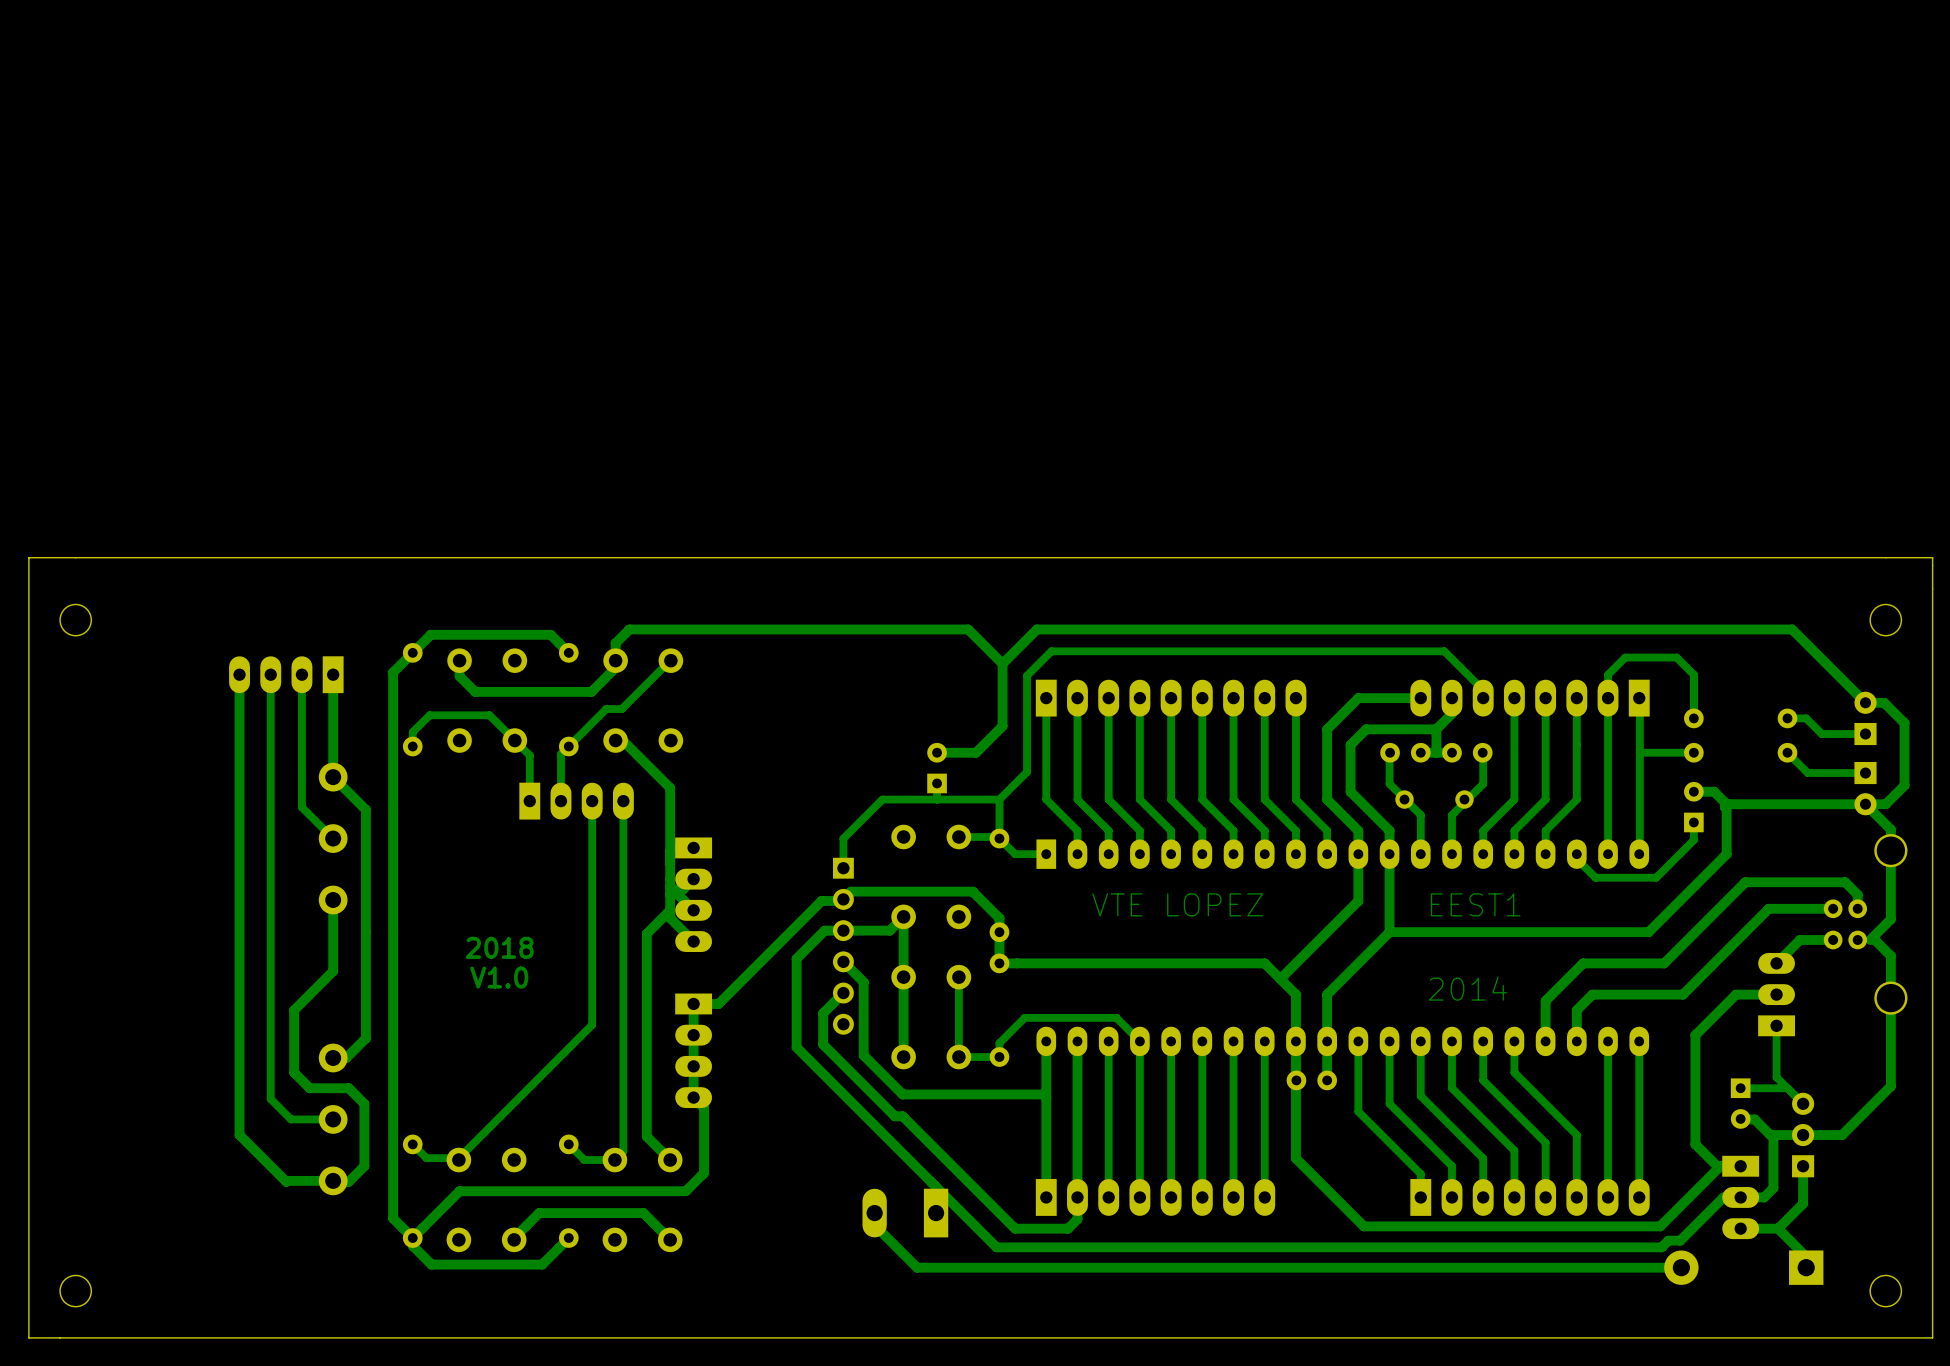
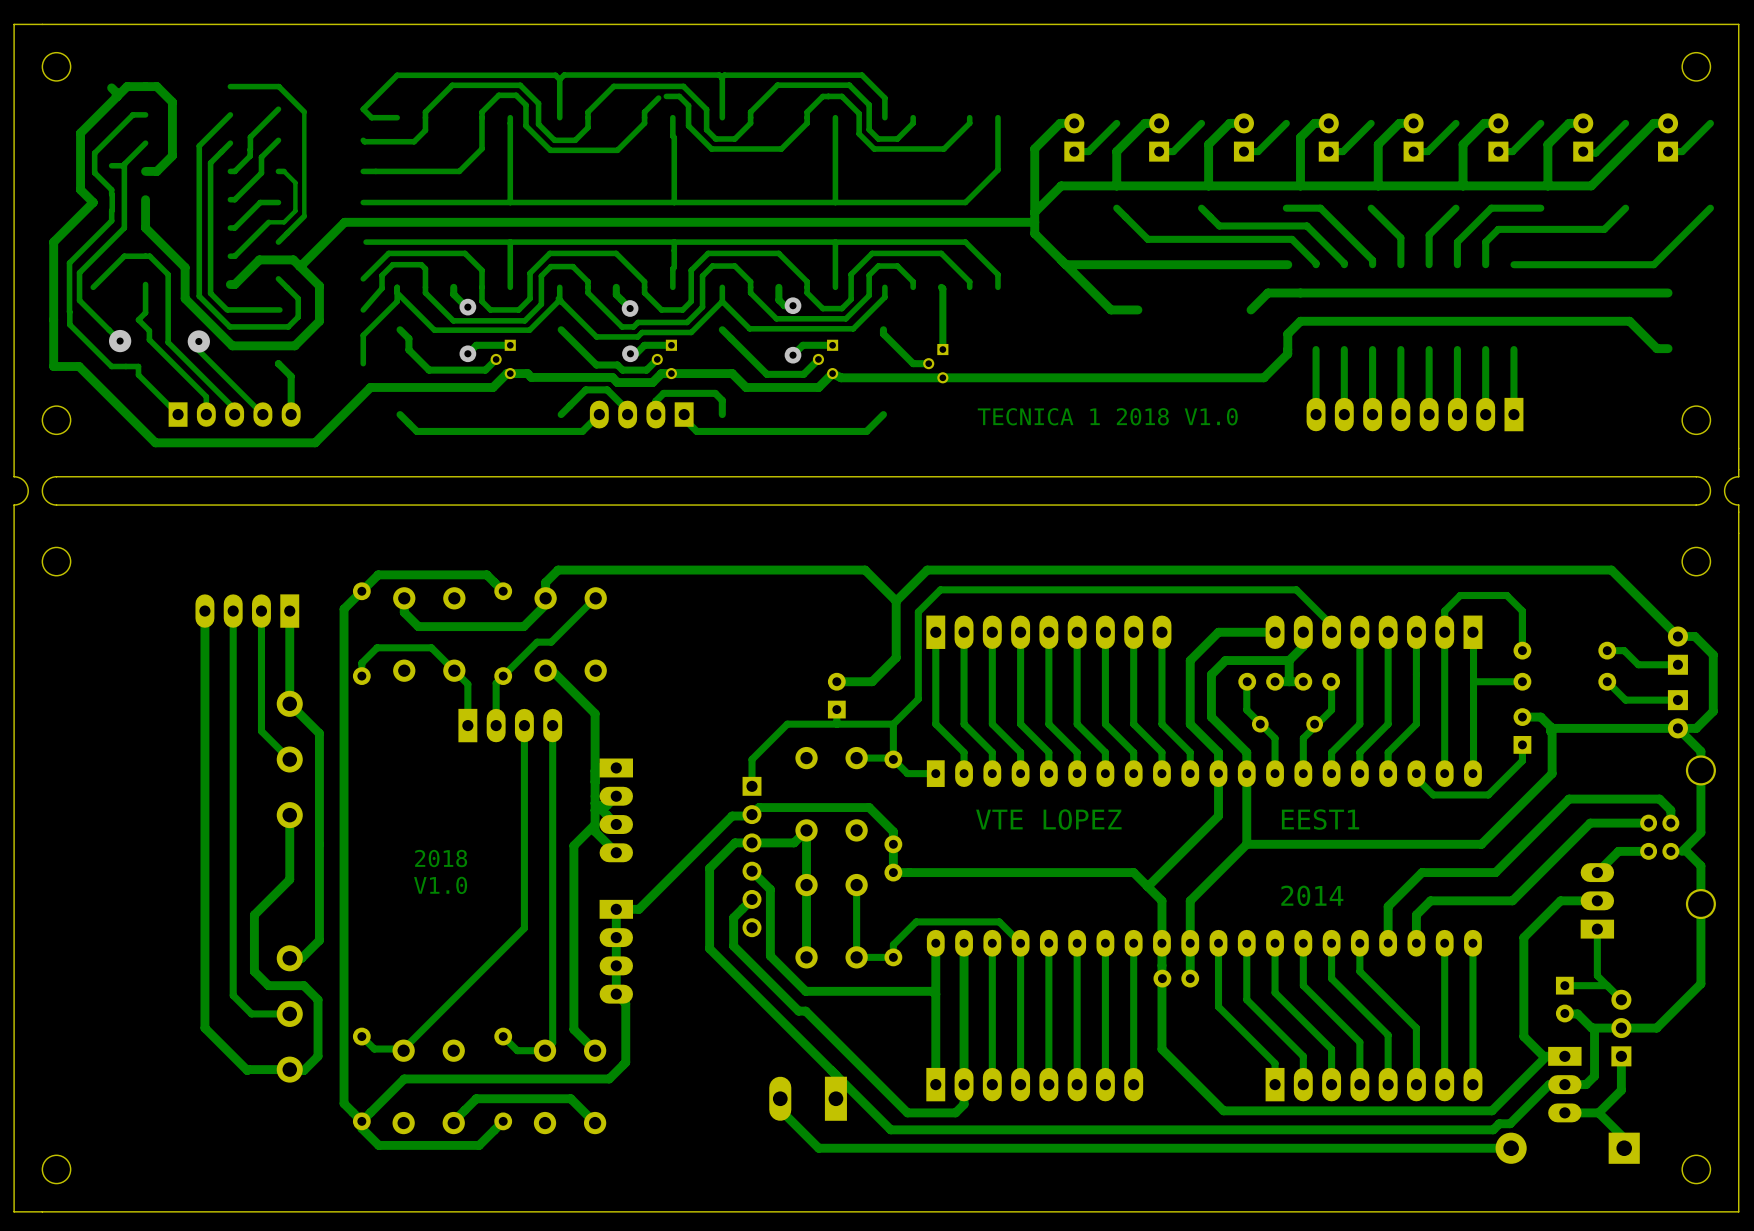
round board edge: none -> [41, 52, 72, 82]
round board edge: none -> [1681, 52, 1712, 82]
track: none -> (721, 77) (724, 75) (861, 75) (884, 98) (884, 117)
track: none -> (559, 79) (559, 117)
track: none -> (559, 79) (555, 75) (397, 75) (363, 109) (371, 117) (397, 117)
track: none -> (559, 79) (564, 75) (719, 75) (722, 78) (722, 117)
track: none -> (230, 86) (278, 86) (304, 112) (304, 216) (278, 242)
track: none -> (111, 87) (117, 96)
track: none -> (666, 96) (679, 96) (688, 105) (688, 125) (711, 149) (781, 149) (807, 123) (807, 112) (822, 96) (828, 96)
track: none -> (828, 96) (841, 96) (859, 113) (859, 133) (874, 149) (943, 149) (969, 123) (969, 117)
track: none -> (658, 98) (644, 112) (644, 123) (617, 150) (550, 150) (525, 125) (525, 105) (516, 95) (498, 95) (482, 112) (482, 148) (459, 171) (363, 171)
track: none -> (278, 109) (250, 137) (250, 156) (234, 171) (230, 171)
track: none -> (145, 114) (132, 114) (94, 153) (94, 172) (111, 189) (111, 220) (69, 263) (69, 324) (111, 366) (138, 366) (138, 374) (178, 414)
track: none -> (230, 114) (199, 145) (199, 296) (229, 326) (288, 326) (298, 317) (298, 298) (278, 278)
track: none -> (510, 117) (510, 202)
track: none -> (672, 117) (674, 202)
track: none -> (835, 117) (835, 202)
track: none -> (913, 117) (913, 123) (897, 138) (878, 138) (869, 129) (869, 104) (849, 85) (777, 85) (750, 112) (750, 123) (734, 138) (715, 138) (706, 129) (706, 109) (683, 86) (613, 86) (588, 112) (588, 127) (575, 140) (554, 140) (538, 124) (538, 103) (520, 85) (452, 85) (425, 112) (425, 130) (414, 141) (363, 140)
track: none -> (997, 117) (997, 170) (965, 202) (363, 202)
track: none -> (1074, 123) (1060, 123) (1034, 148) (1034, 233) (1111, 309) (1137, 309)
track: none -> (1116, 123) (1088, 151) (1074, 151)
track: none -> (1159, 123) (1144, 123) (1116, 151) (1116, 185)
track: none -> (1201, 123) (1173, 151) (1159, 151)
track: none -> (1243, 123) (1229, 123) (1208, 144) (1208, 185)
track: none -> (1286, 123) (1258, 151) (1243, 151)
track: none -> (1328, 123) (1314, 123) (1300, 137) (1300, 185)
track: none -> (1371, 123) (1342, 151) (1328, 151)
track: none -> (1413, 123) (1399, 123) (1378, 144) (1378, 185)
track: none -> (1456, 123) (1427, 151) (1413, 151)
track: none -> (1498, 123) (1484, 123) (1463, 144) (1463, 185)
track: none -> (1540, 123) (1512, 151) (1498, 151)
track: none -> (1583, 123) (1569, 123) (1547, 144) (1547, 185)
track: none -> (1625, 123) (1595, 153) (1583, 151)
track: none -> (1668, 123) (1653, 123) (1591, 185) (1061, 185) (1034, 212)
track: none -> (1710, 123) (1682, 151) (1668, 151)
part: none -> (1074, 137)
part: none -> (1159, 137)
part: none -> (1243, 137)
part: none -> (1328, 137)
part: none -> (1413, 137)
part: none -> (1498, 137)
part: none -> (1583, 137)
part: none -> (1668, 137)
track: none -> (278, 140) (261, 157) (261, 173) (234, 199) (230, 199)
track: none -> (145, 143) (124, 164) (124, 227) (79, 272) (79, 300) (120, 341)
track: none -> (230, 143) (210, 162) (210, 293) (227, 309)
track: none -> (124, 165) (111, 165)
track: none -> (145, 171) (156, 171) (172, 155) (172, 102) (156, 86) (127, 86) (80, 133) (80, 189) (93, 202) (53, 242) (53, 366) (79, 366) (155, 442) (315, 442) (370, 387) (493, 387) (506, 373) (527, 373) (531, 377) (612, 377) (617, 382) (652, 382) (661, 373) (732, 373) (746, 387) (818, 387) (832, 373) (841, 377) (1263, 377) (1287, 353) (1287, 333) (1300, 321) (1629, 321) (1657, 348) (1668, 348)
track: none -> (278, 171) (284, 171) (295, 182) (295, 211) (284, 222) (268, 222) (234, 256) (230, 256)
track: none -> (145, 199) (145, 227) (185, 267) (185, 298) (232, 345) (294, 345) (319, 321) (319, 285) (293, 259) (259, 259) (234, 284) (230, 284)
track: none -> (278, 202) (260, 202) (234, 227) (230, 227)
track: none -> (1116, 208) (1147, 239) (1292, 239) (1316, 264)
track: none -> (1201, 208) (1219, 225) (1306, 225) (1344, 264)
track: none -> (1286, 208) (1320, 208) (1372, 260) (1372, 264)
track: none -> (1371, 208) (1400, 237) (1400, 264)
track: none -> (1456, 208) (1429, 235) (1429, 264)
track: none -> (1540, 208) (1491, 208) (1457, 242) (1457, 264)
track: none -> (1625, 208) (1604, 229) (1498, 229) (1485, 242) (1485, 264)
track: none -> (1710, 208) (1653, 264) (1513, 264)
track: none -> (1034, 222) (344, 222) (301, 265)
track: none -> (366, 242) (965, 242) (997, 274) (997, 287)
track: none -> (510, 242) (510, 287)
track: none -> (674, 242) (672, 287)
track: none -> (835, 242) (835, 287)
track: none -> (1287, 264) (1065, 264)
track: none -> (363, 278) (388, 253) (465, 253) (482, 270) (482, 301) (490, 309) (518, 309) (530, 298) (530, 273) (549, 253) (616, 253) (644, 281) (644, 292) (661, 309) (682, 309) (691, 301) (691, 270) (708, 253) (778, 253) (807, 281) (807, 292) (822, 308) (841, 308) (851, 299) (851, 274) (872, 253) (941, 253) (969, 281) (969, 287)
track: none -> (145, 284) (145, 312) (138, 319) (149, 330) (149, 339) (206, 396) (206, 414)
track: none -> (93, 287) (124, 256) (149, 256) (168, 274) (168, 342) (234, 408) (234, 414)
track: none -> (397, 287) (397, 301) (363, 335) (363, 363)
track: none -> (453, 287) (453, 294) (467, 307)
track: none -> (559, 287) (559, 300)
track: none -> (616, 287) (616, 294) (630, 308)
track: none -> (722, 287) (722, 301)
track: none -> (778, 287) (778, 300) (784, 305) (793, 305)
track: none -> (884, 287) (884, 297) (853, 328) (749, 328) (722, 301)
track: none -> (913, 287) (913, 281) (897, 266) (878, 266) (869, 275) (869, 295) (845, 318) (776, 318) (750, 292) (750, 281) (734, 266) (712, 266) (702, 276) (702, 307) (687, 322) (637, 322) (633, 326) (622, 326) (588, 292) (588, 281) (572, 266) (550, 266) (541, 276) (541, 304) (524, 320) (453, 320) (425, 292) (425, 268) (421, 264) (392, 264) (382, 275) (382, 288) (363, 309)
track: none -> (941, 287) (942, 349)
track: none -> (397, 292) (434, 330) (529, 330) (558, 301) (561, 301)
track: none -> (1668, 292) (1267, 292) (1251, 309)
track: none -> (558, 298) (596, 336) (637, 336) (642, 332) (691, 332) (722, 301)
via: none -> (793, 305)
via: none -> (467, 307)
via: none -> (630, 308)
track: none -> (279, 309) (228, 309)
track: none -> (400, 329) (408, 338) (408, 349) (429, 370) (485, 370) (496, 359)
track: none -> (561, 329) (596, 365) (617, 365) (622, 370) (646, 370) (657, 359)
track: none -> (722, 329) (766, 374) (803, 374) (818, 359)
track: none -> (883, 329) (883, 333) (913, 363) (928, 363)
via: none -> (120, 341)
track: none -> (198, 341) (198, 350) (262, 414)
via: none -> (198, 341)
track: none -> (510, 345) (476, 345) (467, 353)
track: none -> (671, 345) (644, 345) (636, 353) (630, 353)
track: none -> (832, 345) (802, 345) (793, 355)
track: none -> (1316, 349) (1316, 414)
track: none -> (1344, 349) (1344, 414)
track: none -> (1372, 349) (1372, 414)
track: none -> (1400, 349) (1400, 414)
track: none -> (1429, 349) (1429, 414)
track: none -> (1457, 349) (1457, 414)
track: none -> (1485, 349) (1485, 414)
track: none -> (1513, 349) (1513, 414)
via: none -> (467, 353)
via: none -> (630, 353)
via: none -> (793, 355)
part: none -> (503, 359)
part: none -> (664, 359)
part: none -> (825, 359)
track: none -> (278, 363) (291, 376) (291, 414)
part: none -> (935, 363)
round board edge: none -> [41, 405, 72, 435]
round board edge: none -> [1681, 405, 1712, 435]
part: none -> (234, 414)
track: none -> (599, 414) (582, 431) (416, 431) (400, 414)
track: none -> (627, 414) (627, 410) (607, 389) (585, 389) (561, 414)
part: none -> (641, 414)
track: none -> (722, 414) (722, 400) (715, 393) (663, 393) (655, 401) (655, 414)
track: none -> (883, 414) (866, 431) (696, 431) (684, 418) (684, 414)
part: none -> (1415, 414)
text: none -> TECNICA 1 2018 V1.0 (1107, 416)
board edge: (75, 557) (28, 557) -> (56, 505) (46, 500) (42, 490) (46, 480) (56, 476) (1696, 476) (1706, 480) (1710, 490) (1706, 500) (1696, 505)
board edge: (1932, 557) (1885, 557) -> (1738, 505) (1728, 500) (1724, 490) (1728, 480) (1738, 476) (1738, 24) (14, 24) (14, 476) (24, 480) (28, 490) (24, 500) (14, 505)

